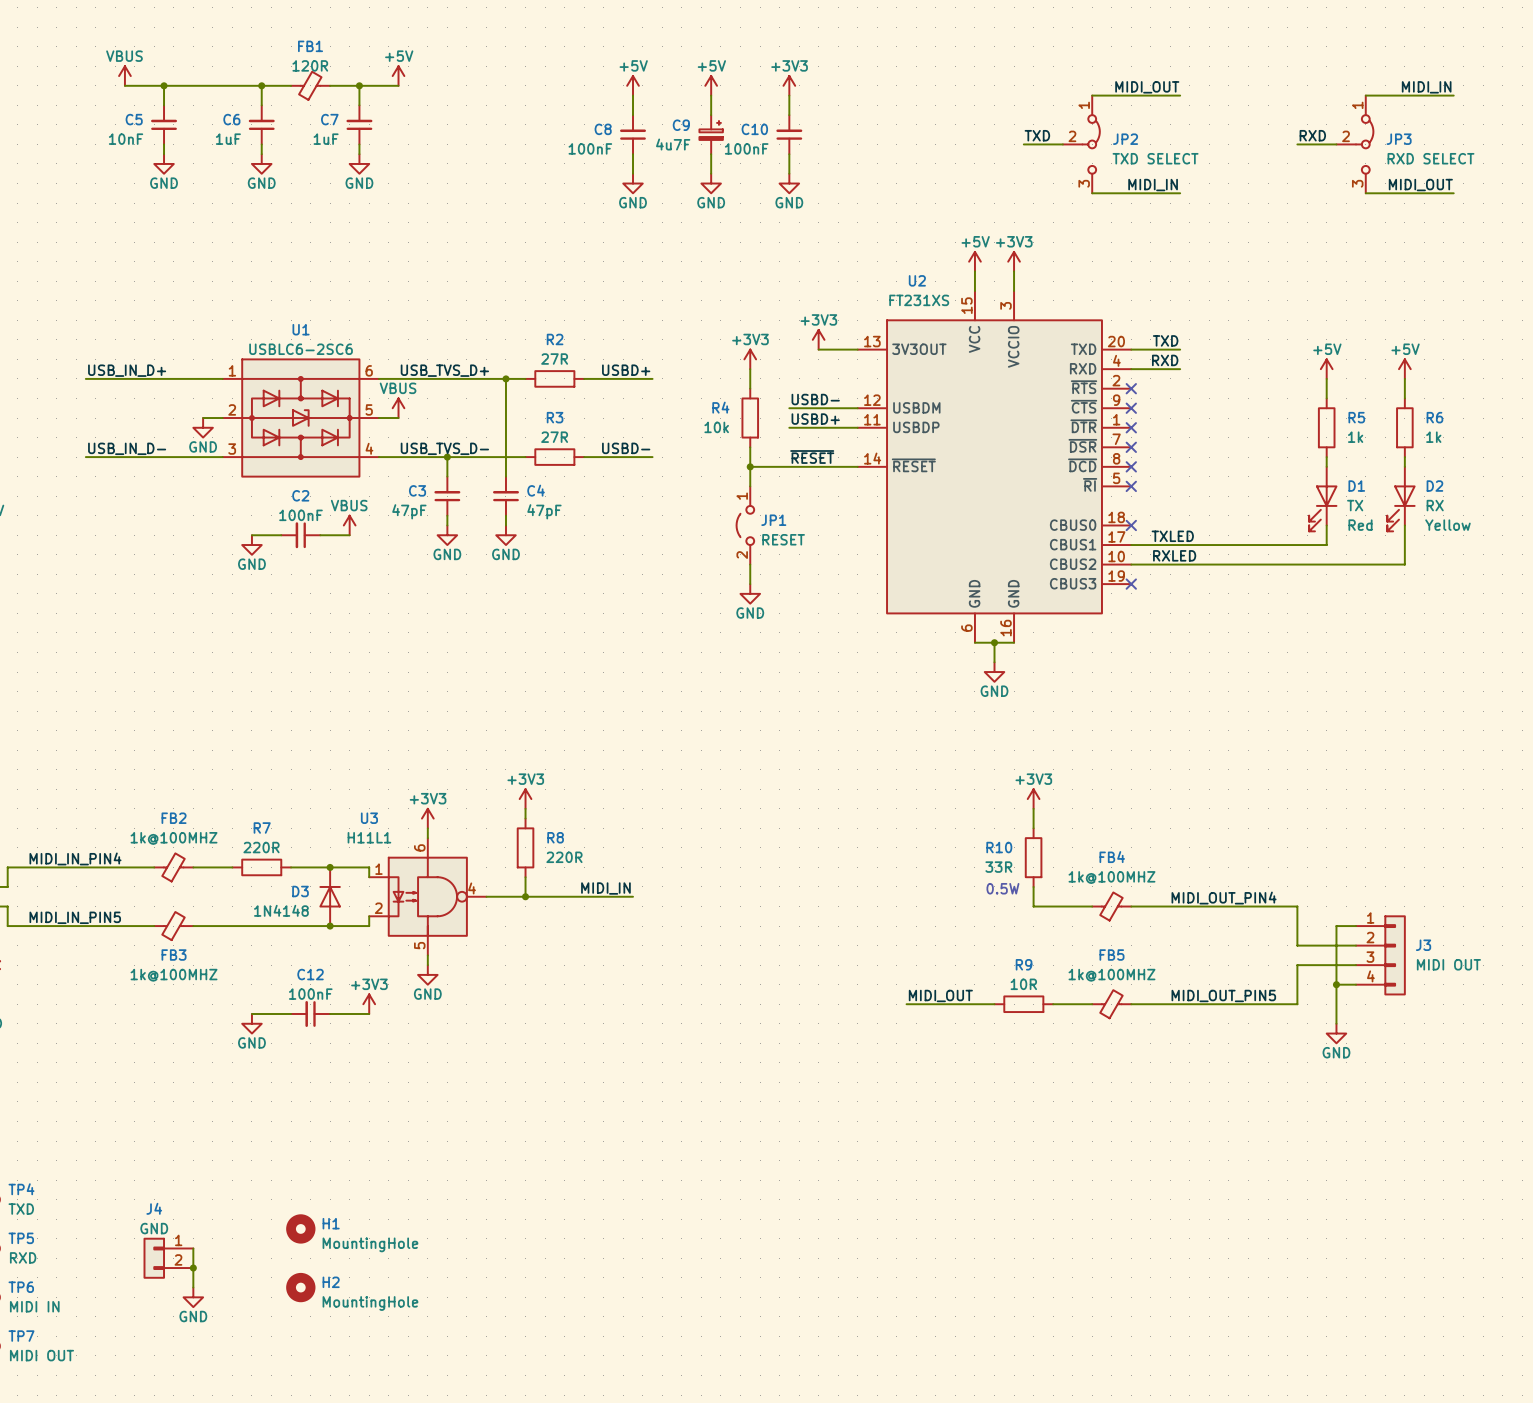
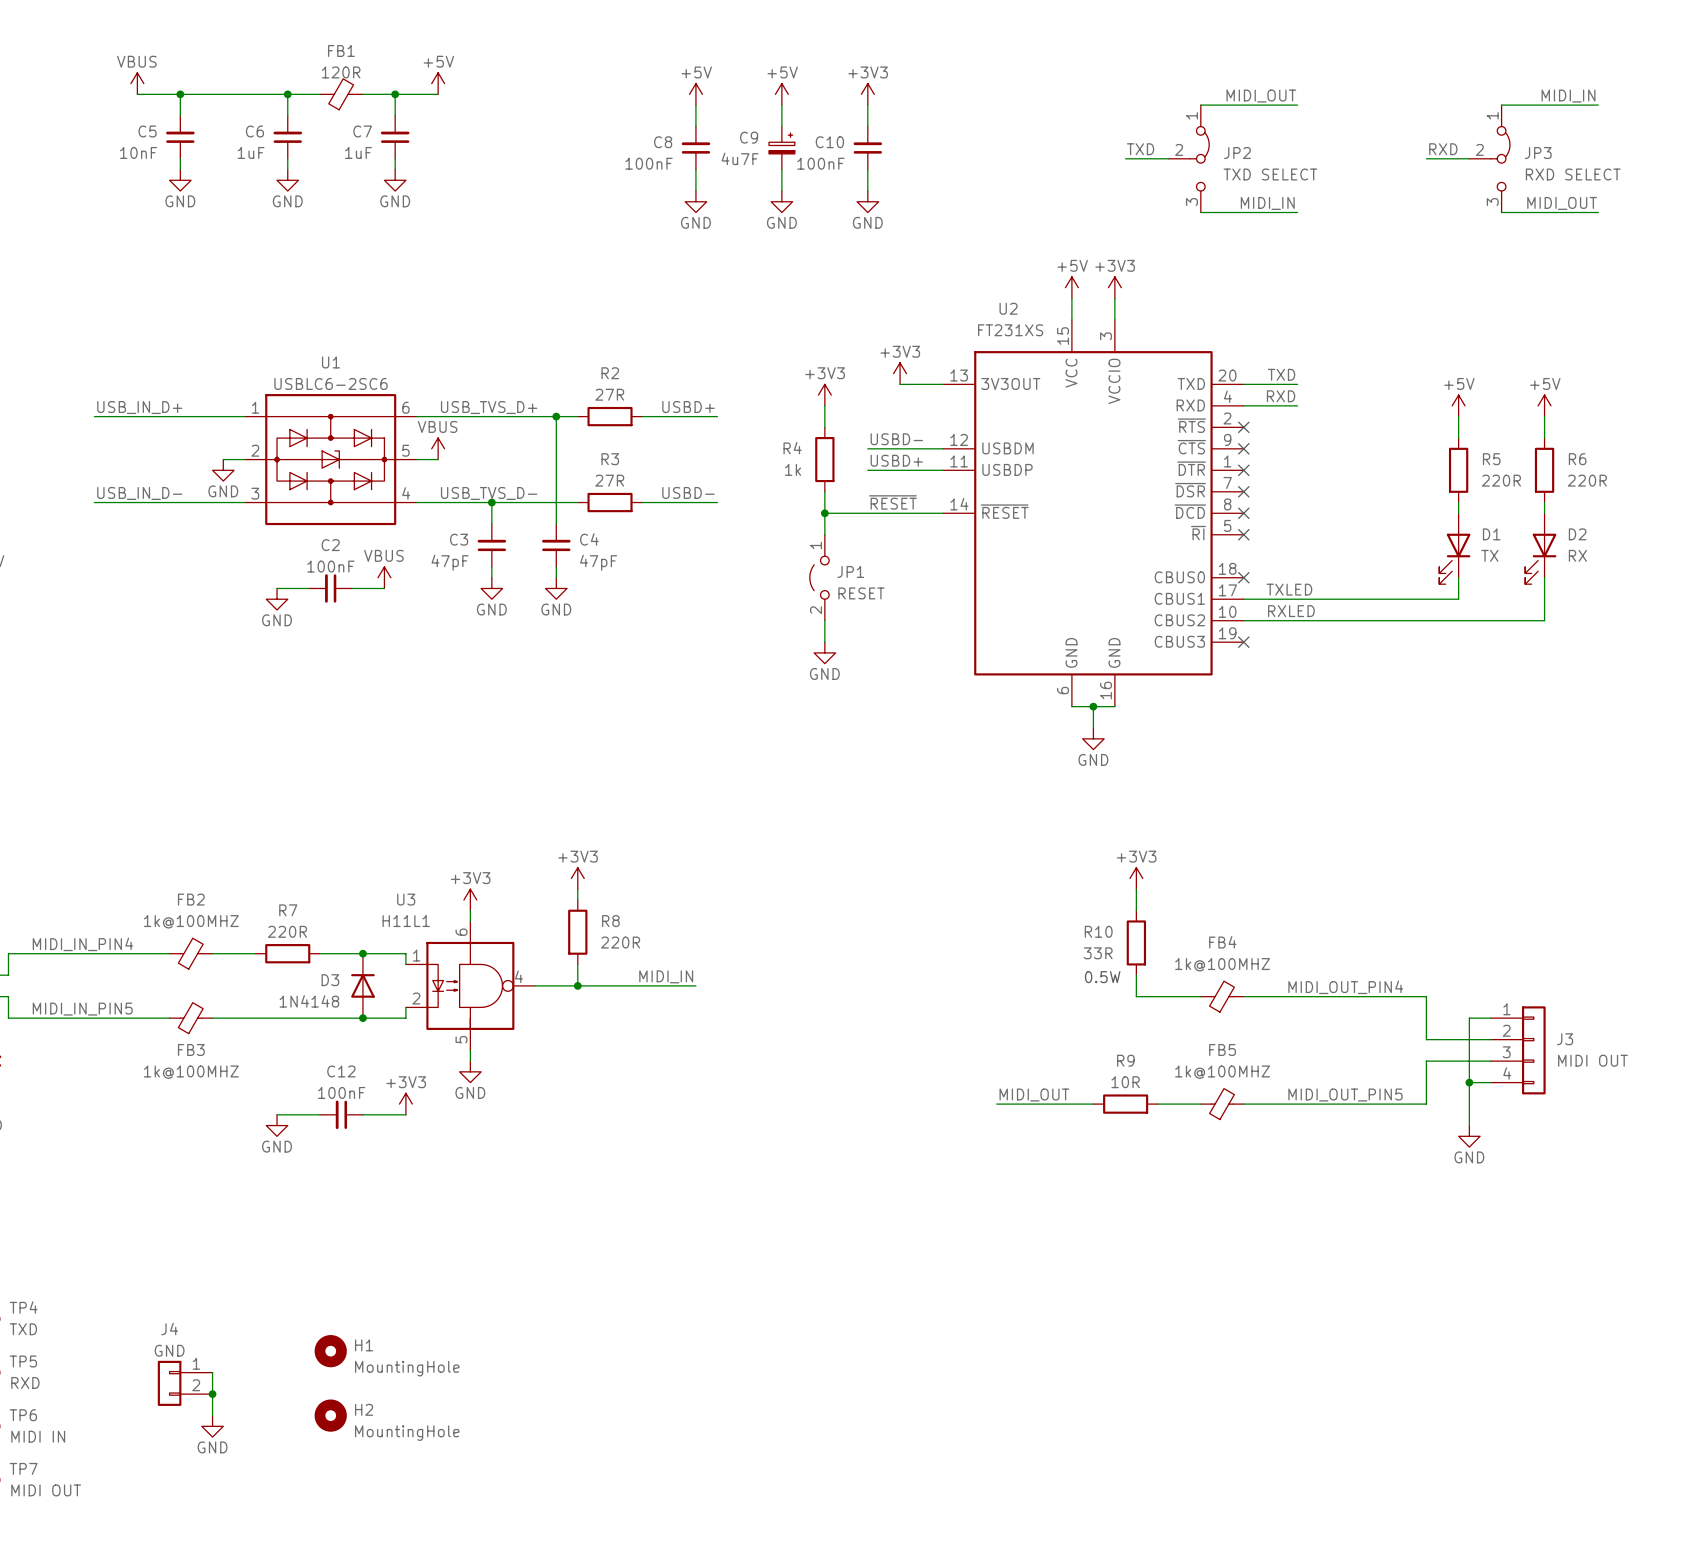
R4 value: 10k (716, 427) -> 1k (793, 469)
R5 value: 1k (1355, 437) -> 220R (1501, 480)
R6 value: 1k (1433, 437) -> 220R (1587, 480)
D1 text: Red (1360, 525) -> none
D2 text: Yellow (1447, 525) -> none

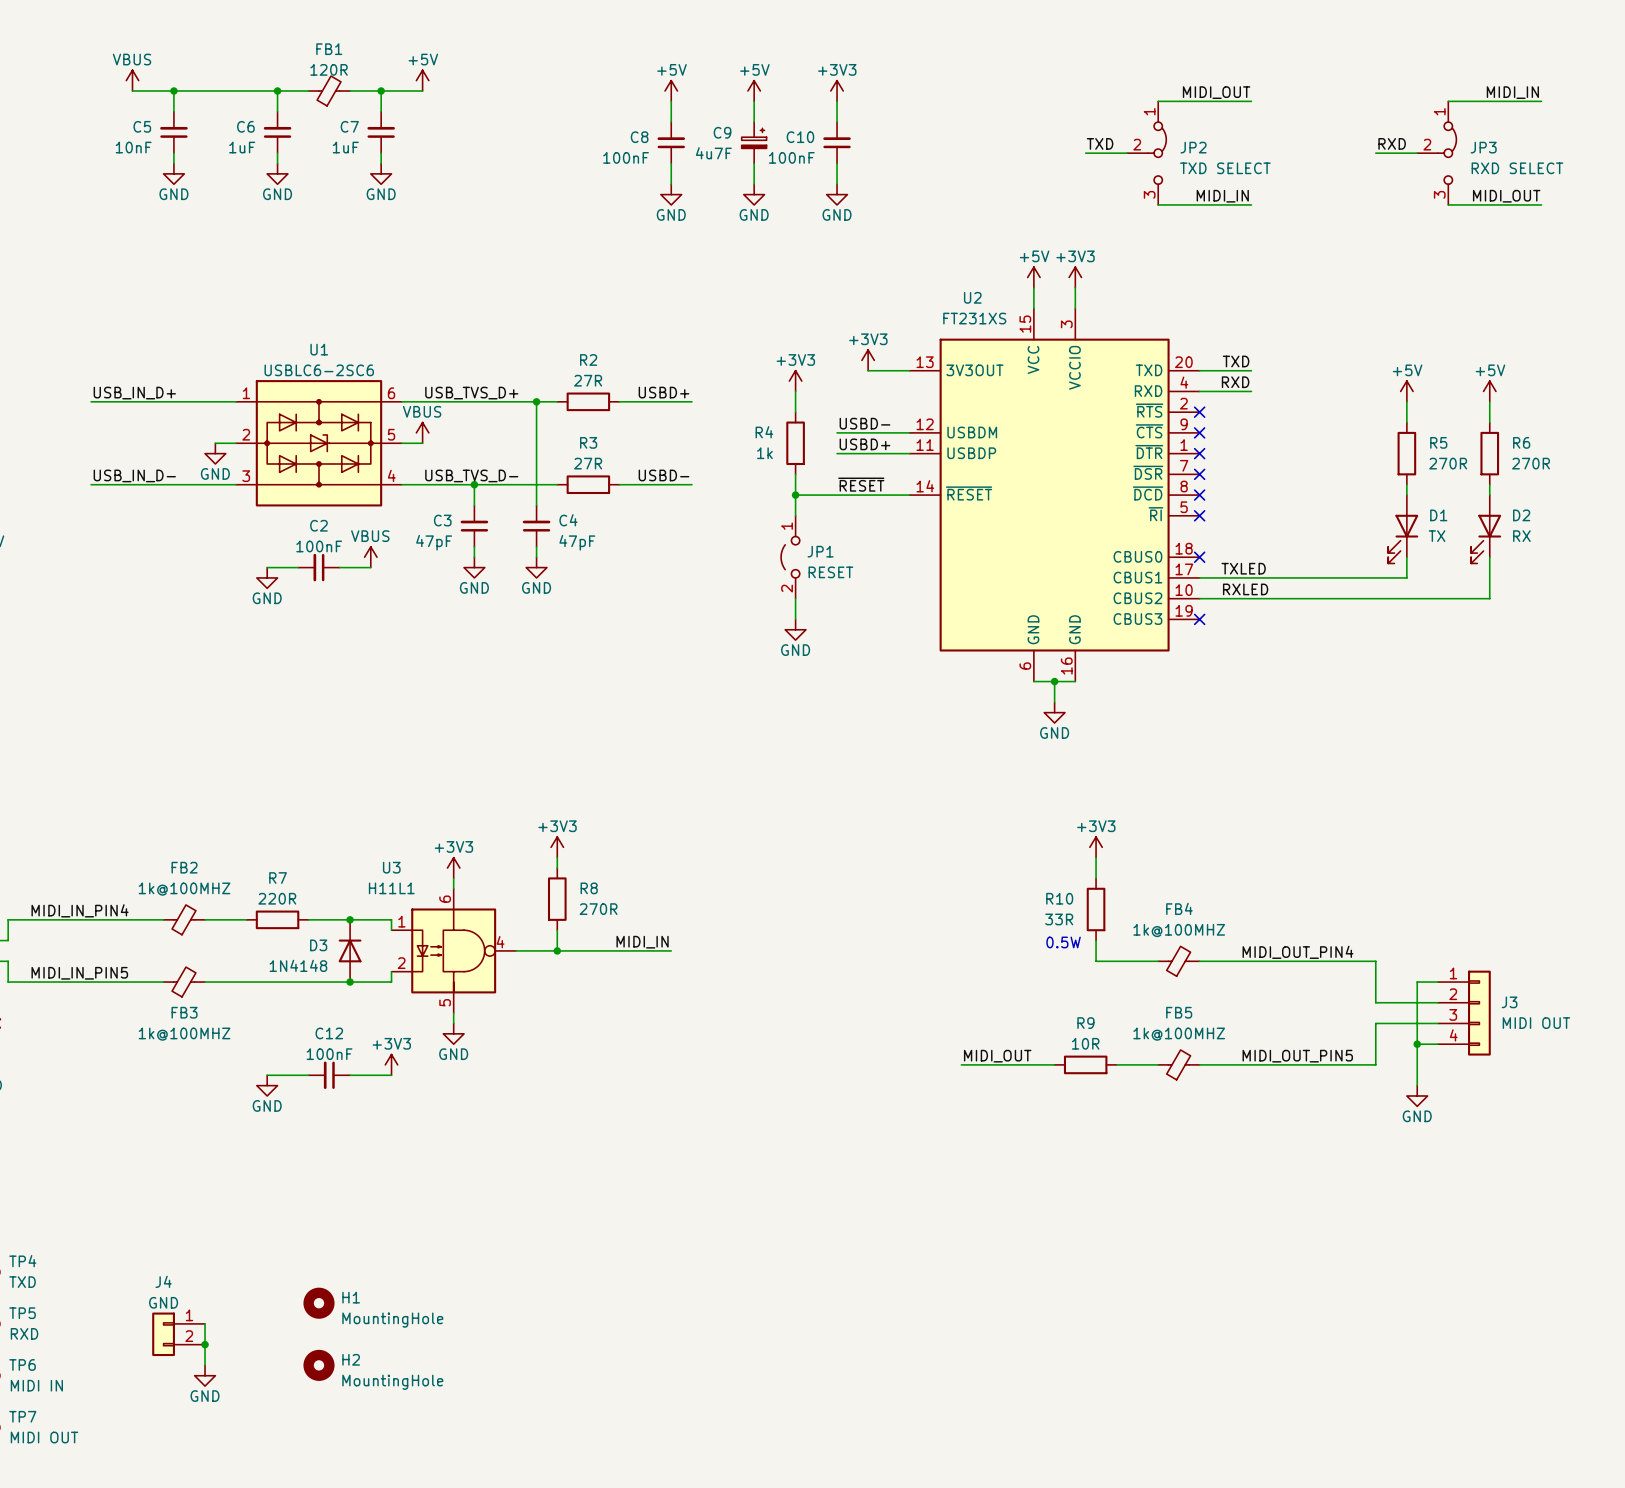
R5 value: 220R (1501, 480) -> 270R (1448, 463)
R6 value: 220R (1587, 480) -> 270R (1531, 463)
R8 value: 220R (620, 942) -> 270R (598, 909)

